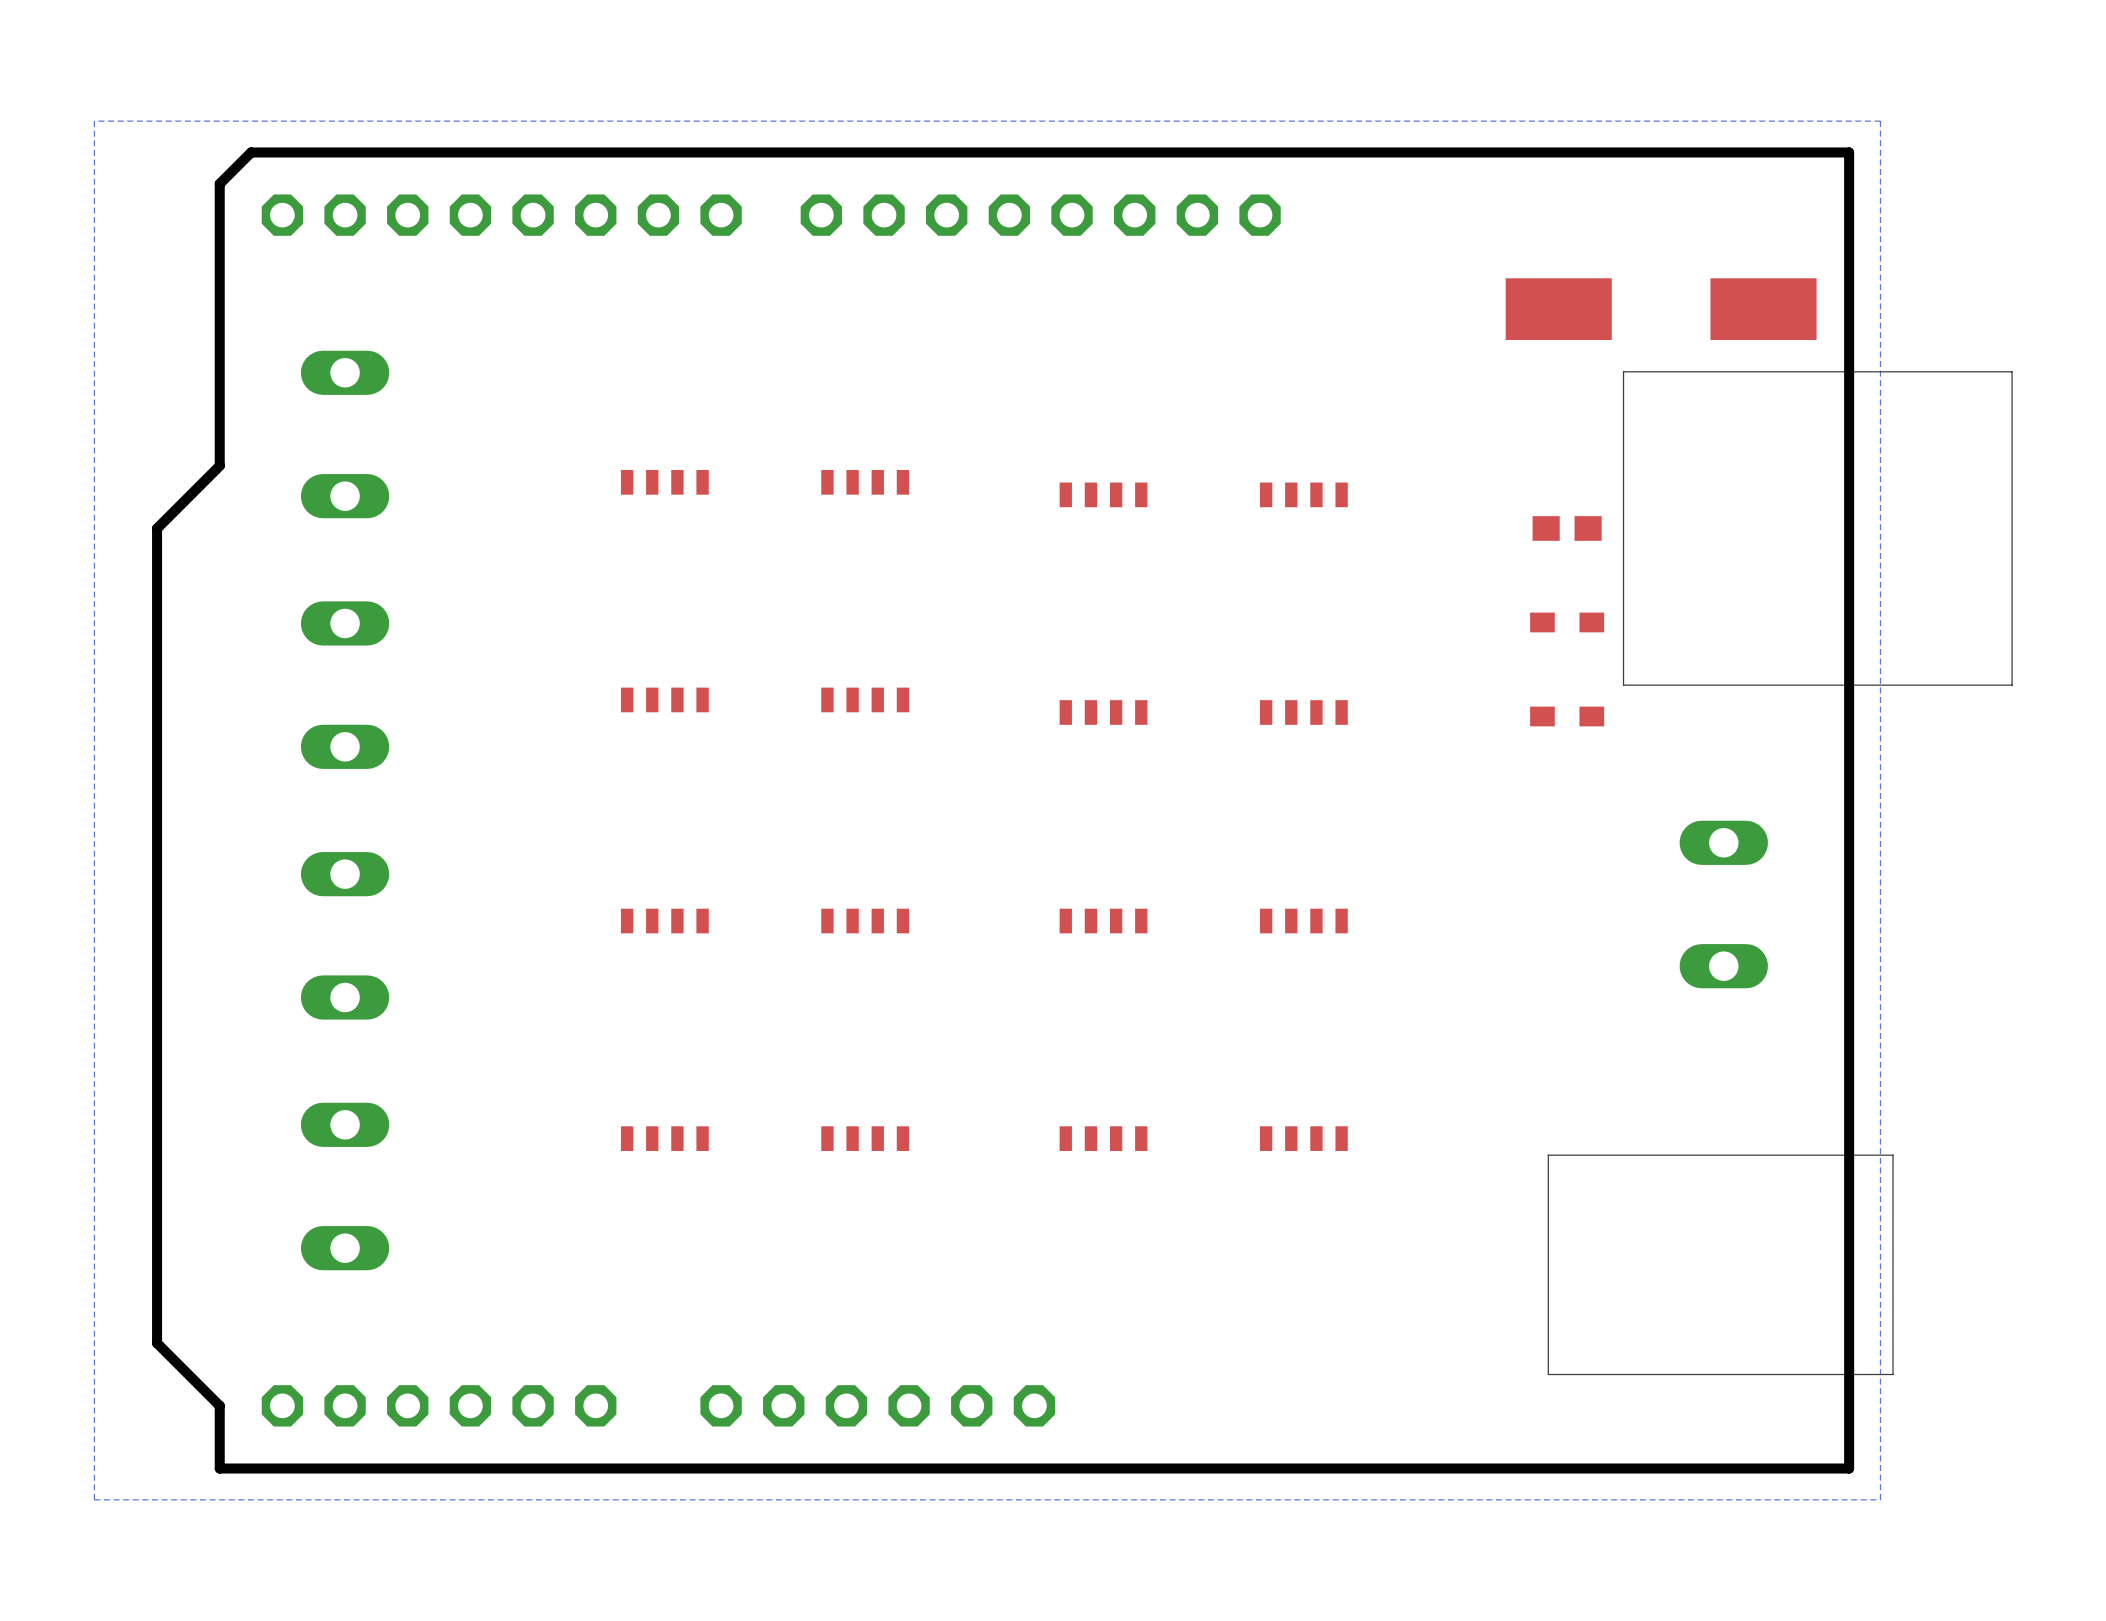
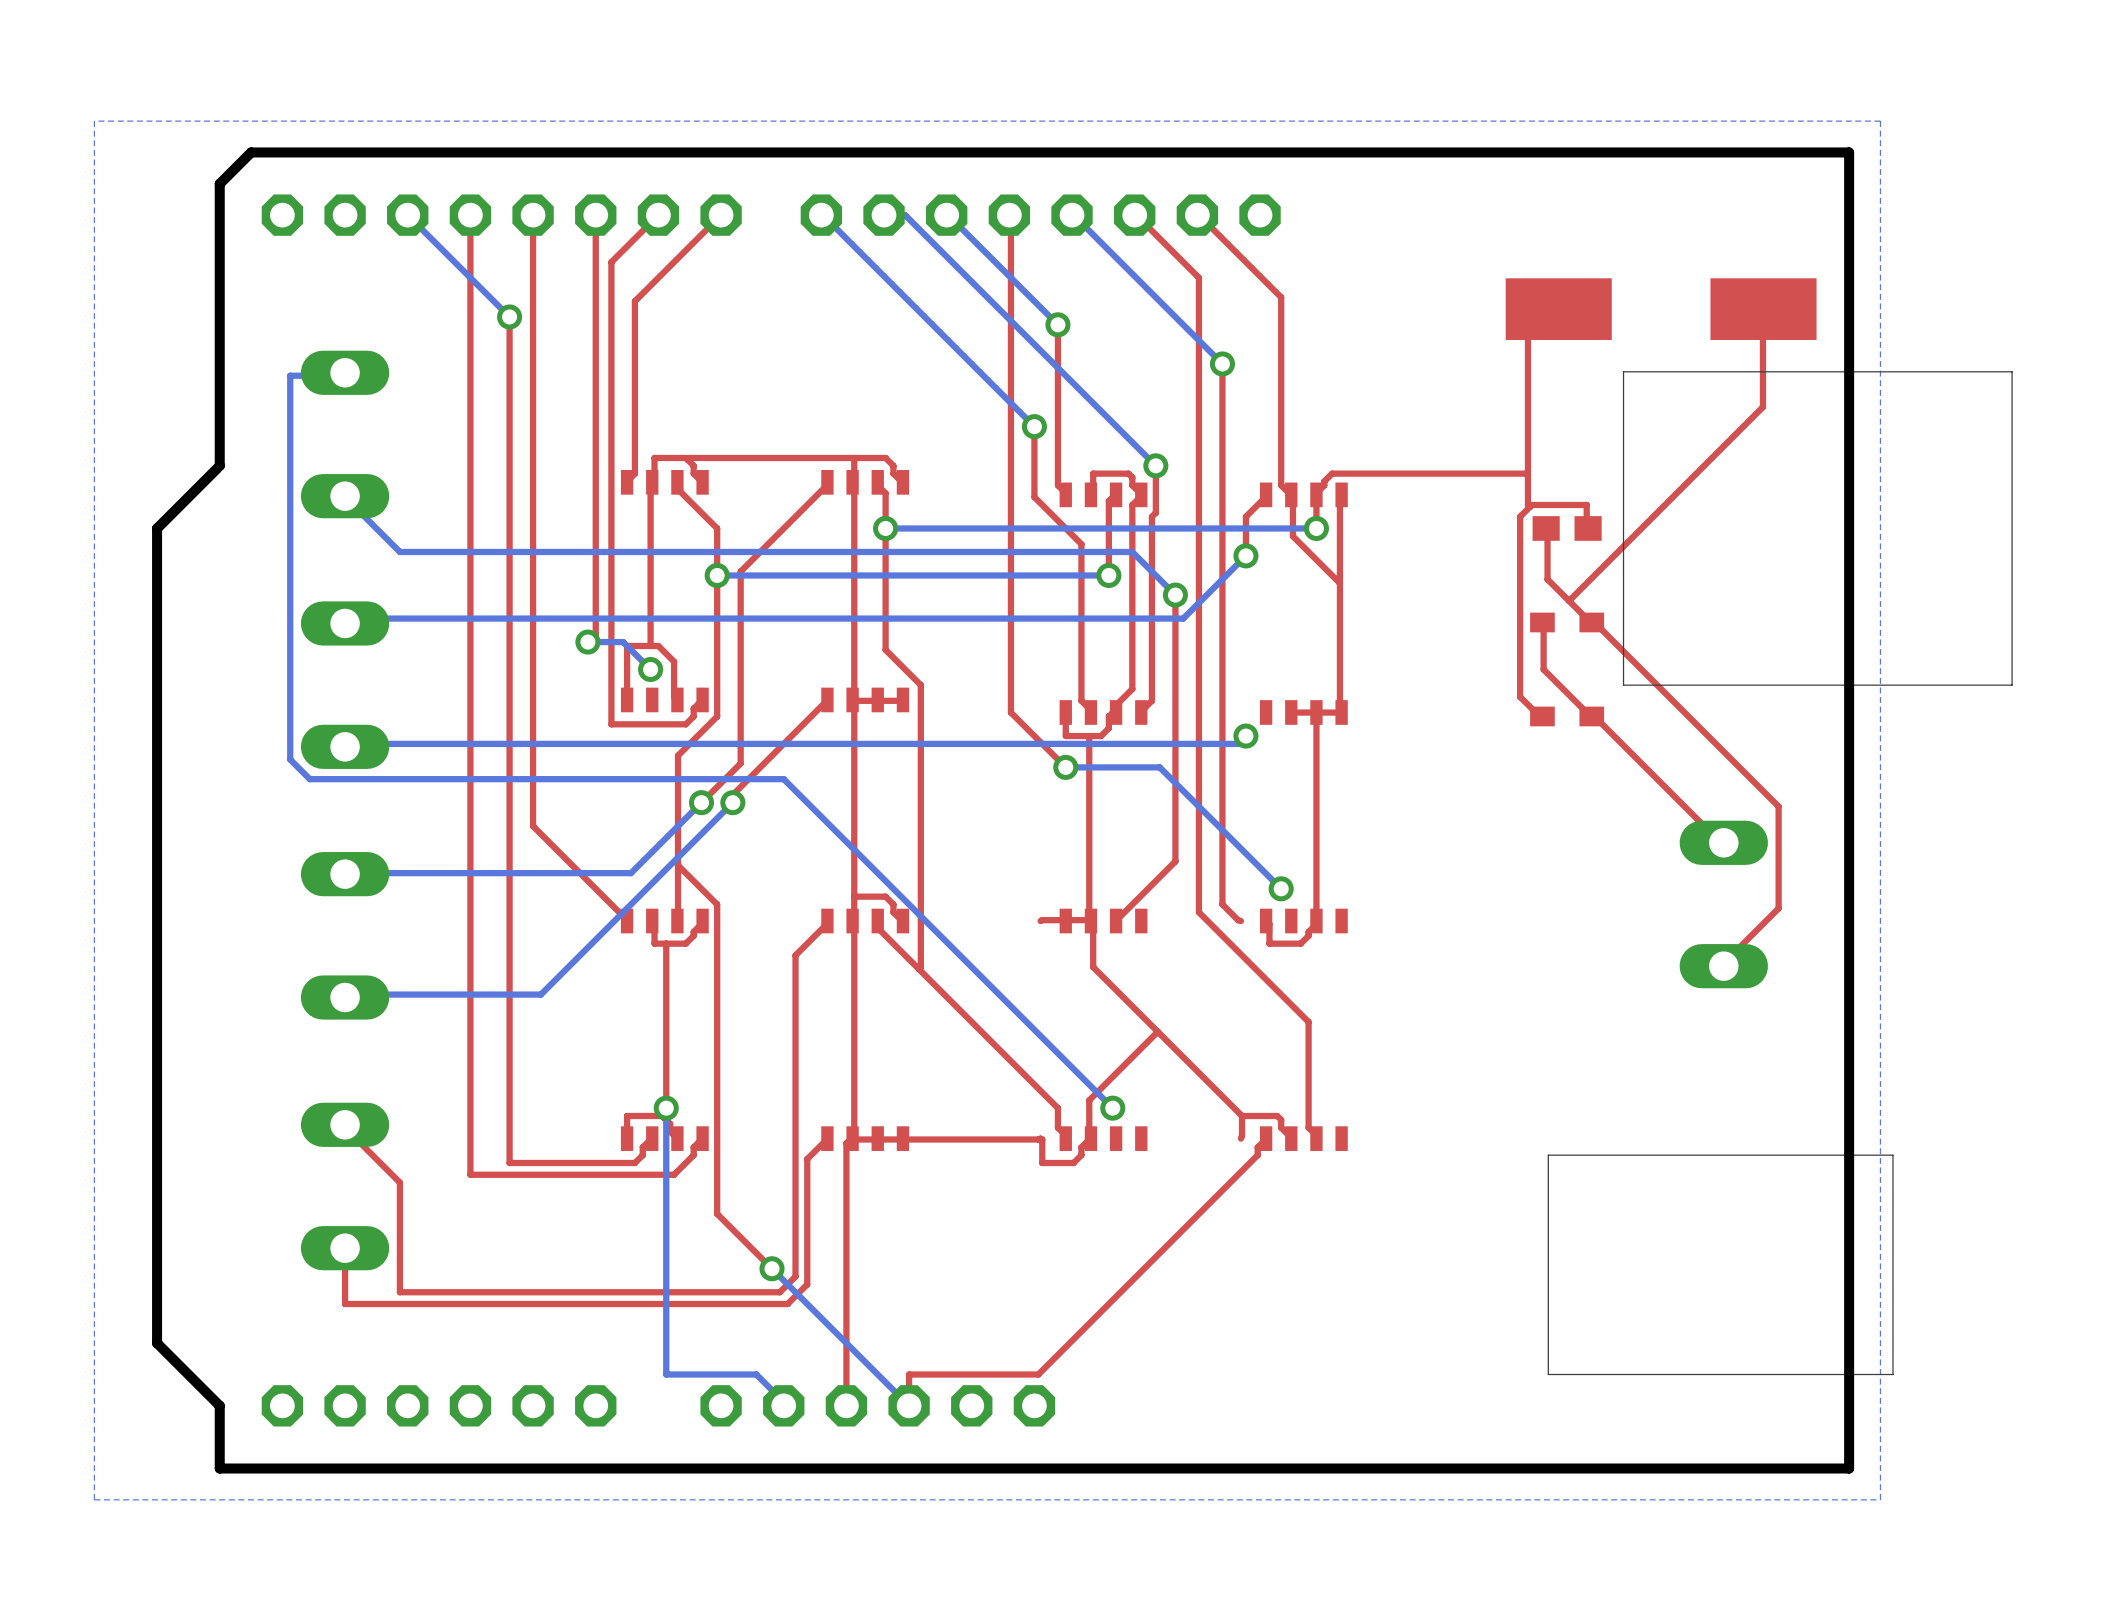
bottom track: none -> (407, 215) (509, 316)
top track: none -> (470, 215) (470, 1174) (674, 1174) (693, 1155) (693, 1147) (702, 1138)
top track: none -> (533, 215) (533, 826) (627, 921)
top track: none -> (595, 215) (595, 634) (587, 642)
top track: none -> (658, 215) (611, 262) (611, 724) (685, 724) (693, 716) (693, 708) (702, 699)
top track: none -> (721, 215) (634, 301) (634, 473) (627, 482)
bottom track: none -> (821, 215) (1034, 426)
bottom track: none -> (884, 215) (905, 215) (1155, 465)
bottom track: none -> (946, 215) (1057, 324)
top track: none -> (1009, 215) (1010, 215) (1010, 712) (1065, 767)
bottom track: none -> (1072, 215) (1222, 363)
top track: none -> (1134, 215) (1198, 277) (1198, 912) (1308, 1021) (1308, 1127) (1316, 1135) (1316, 1138)
top track: none -> (1197, 215) (1281, 297) (1281, 485) (1292, 497) (1292, 536) (1339, 583)
top track: none -> (1558, 309) (1555, 309) (1527, 336) (1527, 504) (1529, 506)
top track: none -> (1763, 309) (1762, 407) (1569, 600)
top track: none -> (509, 316) (509, 1163) (634, 1163) (642, 1155) (642, 1147) (652, 1138)
via: none -> (509, 316)
top track: none -> (1057, 324) (1057, 485) (1065, 494)
via: none -> (1057, 324)
top track: none -> (1222, 363) (1222, 904) (1240, 921)
via: none -> (1222, 363)
bottom track: none -> (345, 372) (345, 375) (290, 375) (290, 759) (309, 779) (783, 779) (1112, 1108)
top track: none -> (1034, 426) (1034, 497) (1081, 544) (1081, 700) (1090, 712)
via: none -> (1034, 426)
top track: none -> (854, 457) (854, 481) (852, 482) (854, 485) (854, 696) (852, 699) (854, 700)
top track: none -> (687, 459) (689, 457) (885, 457) (893, 465) (893, 473) (902, 482)
top track: none -> (1155, 465) (1155, 512) (1151, 516) (1151, 700) (1141, 712)
via: none -> (1155, 465)
top track: none -> (1527, 473) (1332, 473) (1316, 493) (1316, 528)
top track: none -> (677, 482) (678, 489) (717, 528) (717, 716) (678, 755) (677, 921)
top track: none -> (702, 482) (693, 473) (693, 465) (685, 457) (654, 457) (654, 481) (650, 485) (650, 645)
top track: none -> (827, 482) (826, 485) (740, 571) (740, 763) (701, 802)
top track: none -> (877, 482) (877, 485) (885, 493) (885, 649) (920, 685) (920, 967) (918, 969)
top track: none -> (1090, 494) (1093, 493) (1093, 473) (1128, 473) (1132, 477) (1132, 485) (1141, 494) (1132, 504) (1132, 689) (1116, 704) (1116, 712) (1112, 712) (1108, 716) (1108, 728) (1101, 736) (1065, 736) (1065, 712)
top track: none -> (1116, 494) (1108, 501) (1108, 575)
top track: none -> (1266, 494) (1245, 516) (1245, 555)
top track: none -> (1341, 494) (1339, 497) (1339, 708) (1341, 712) (1291, 712)
bottom track: none -> (345, 496) (399, 551) (1132, 551) (1175, 595)
via: none -> (885, 528)
bottom track: none -> (1316, 528) (885, 528)
via: none -> (1316, 528)
top track: none -> (1546, 528) (1547, 579) (1590, 622) (1594, 622) (1778, 806) (1778, 908) (1723, 963) (1723, 966)
top track: none -> (1588, 528) (1586, 504) (1531, 504) (1520, 516) (1520, 696) (1539, 716) (1542, 716)
bottom track: none -> (1245, 555) (1183, 618) (348, 618) (345, 623)
via: none -> (1245, 555)
via: none -> (717, 575)
bottom track: none -> (1108, 575) (717, 575)
via: none -> (1108, 575)
top track: none -> (1175, 595) (1175, 861) (1116, 921)
via: none -> (1175, 595)
top track: none -> (1542, 622) (1543, 669) (1590, 716) (1594, 716) (1723, 845) (1723, 842)
bottom track: none -> (587, 642) (623, 642) (650, 669)
via: none -> (587, 642)
via: none -> (650, 669)
top track: none -> (677, 699) (674, 696) (674, 661) (658, 645) (627, 645) (627, 699)
top track: none -> (827, 699) (732, 794) (732, 802)
top track: none -> (902, 699) (854, 700)
top track: none -> (854, 700) (854, 920) (852, 921) (854, 924) (854, 1135) (852, 1138)
top track: none -> (1316, 712) (1316, 924) (1300, 943) (1269, 943) (1269, 924) (1266, 921)
top track: none -> (1089, 736) (1089, 920)
bottom track: none -> (1245, 736) (1238, 743) (345, 743) (345, 746)
via: none -> (1245, 736)
bottom track: none -> (1065, 767) (1159, 767) (1281, 888)
via: none -> (1065, 767)
bottom track: none -> (701, 802) (631, 873) (345, 874)
via: none -> (701, 802)
bottom track: none -> (732, 802) (540, 994) (345, 994) (345, 997)
via: none -> (732, 802)
top track: none -> (678, 865) (717, 904) (717, 1213) (772, 1268)
via: none -> (1281, 888)
top track: none -> (854, 896) (885, 896) (893, 904) (893, 912) (902, 921)
top track: none -> (1089, 920) (1040, 921)
top track: none -> (1089, 920) (1093, 924) (1093, 967) (1242, 1116)
top track: none -> (702, 921) (693, 931) (693, 935) (685, 943) (654, 943) (654, 924) (652, 921)
top track: none -> (827, 921) (826, 924) (795, 955) (795, 1276) (779, 1292) (399, 1292) (399, 1182) (345, 1127) (345, 1124)
top track: none -> (877, 921) (877, 927) (1057, 1108) (1057, 1127) (1065, 1135) (1065, 1138)
top track: none -> (666, 943) (666, 1116) (664, 1117)
top track: none -> (1157, 1031) (1089, 1100) (1089, 1135) (1090, 1138) (1081, 1147) (1081, 1155) (1073, 1163) (1042, 1163) (1042, 1139) (1040, 1138) (852, 1138)
bottom track: none -> (666, 1108) (666, 1374) (756, 1374) (783, 1401) (783, 1405)
via: none -> (666, 1108)
via: none -> (1112, 1108)
top track: none -> (1242, 1116) (1277, 1116) (1281, 1119) (1281, 1127) (1291, 1138)
top track: none -> (1242, 1116) (1240, 1138)
top track: none -> (677, 1138) (670, 1131) (670, 1123) (662, 1116) (627, 1116) (627, 1138)
top track: none -> (827, 1138) (807, 1159) (807, 1284) (787, 1304) (345, 1304) (345, 1248)
top track: none -> (852, 1138) (846, 1143) (846, 1405)
top track: none -> (1266, 1138) (1257, 1147) (1257, 1155) (1038, 1374) (909, 1374) (909, 1405)
bottom track: none -> (772, 1268) (909, 1405)
via: none -> (772, 1268)

